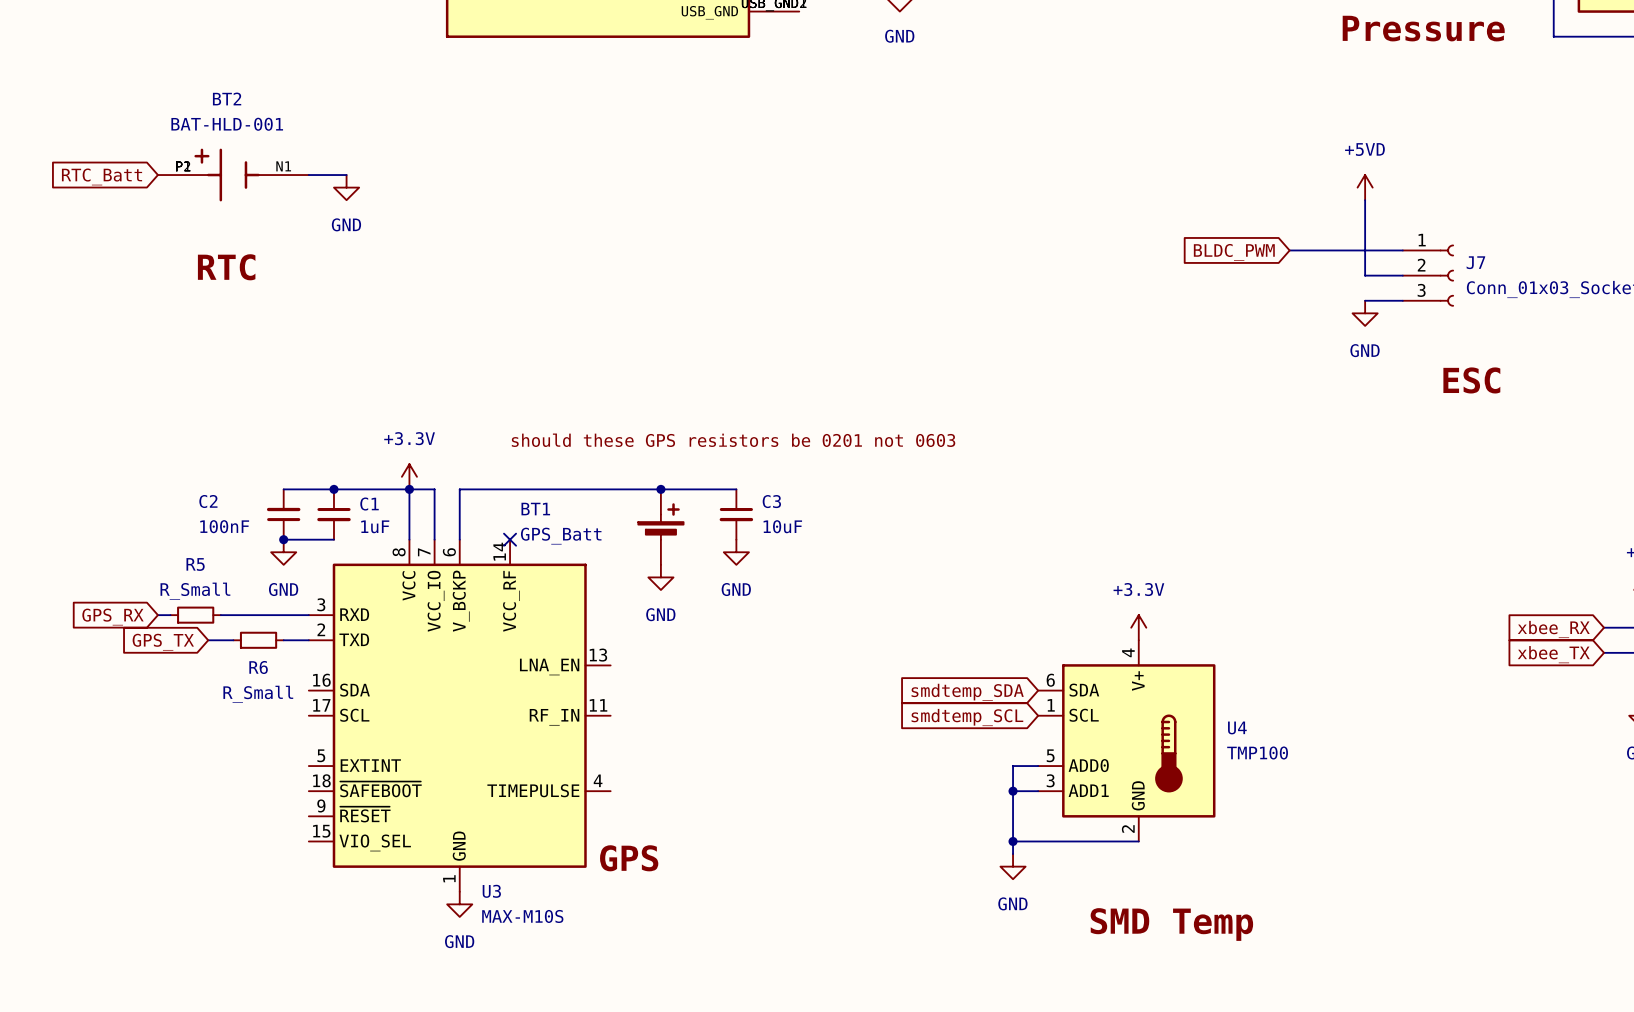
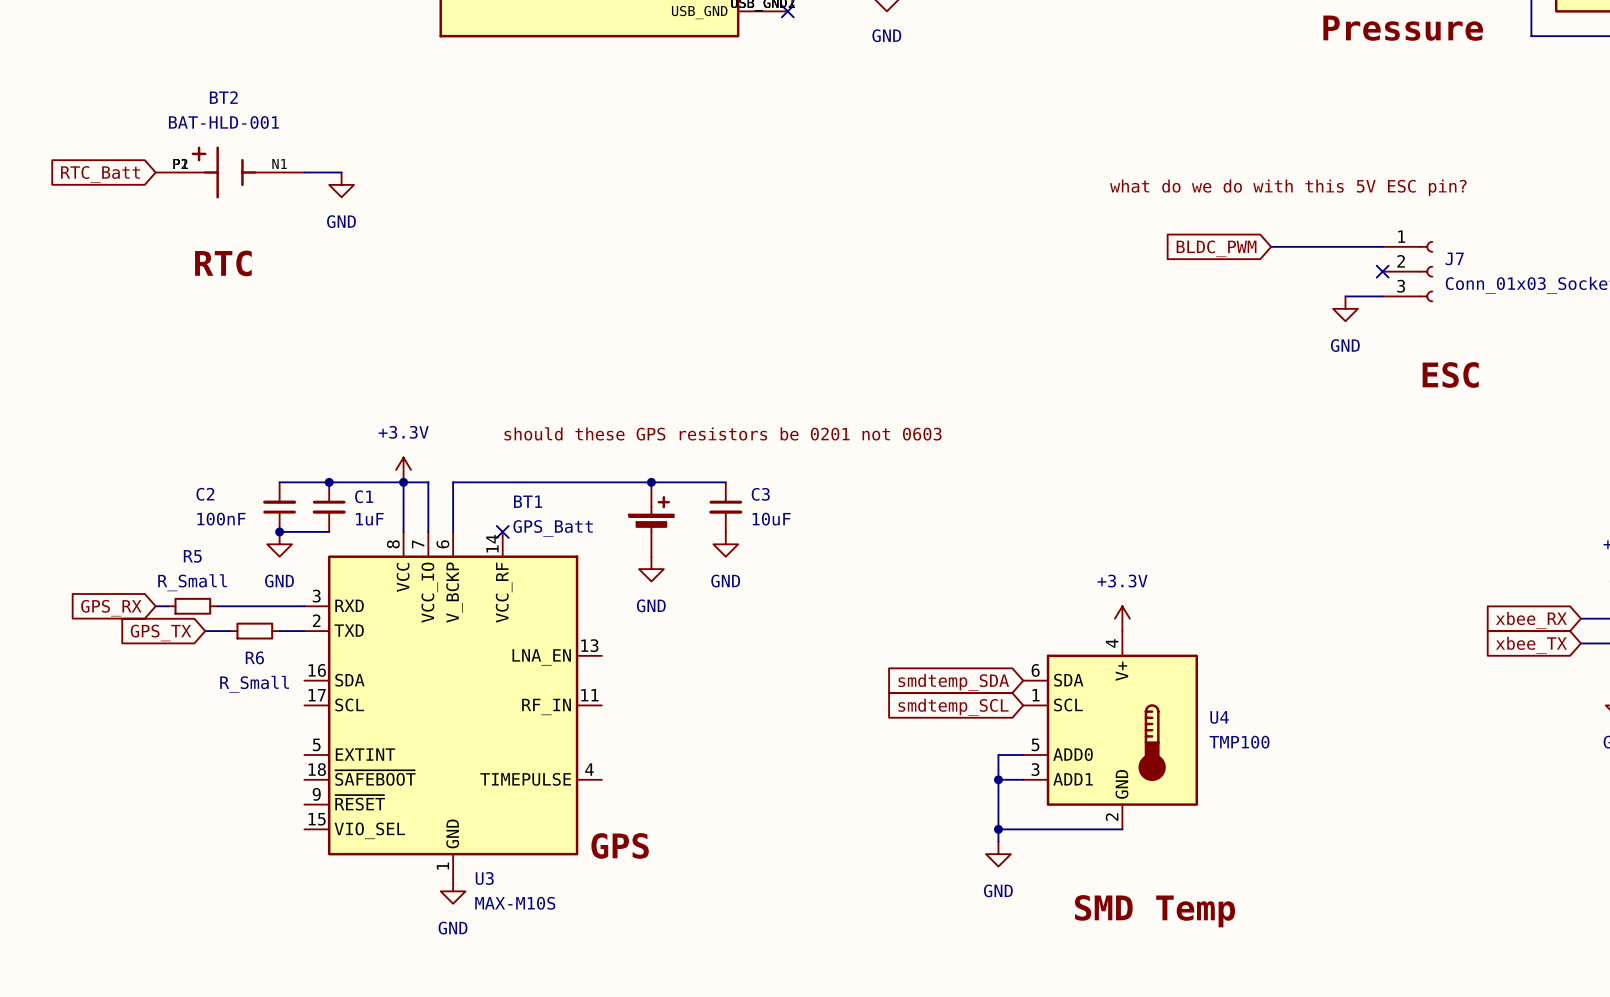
no-connect mark: none -> (787, 11)
power symbol: +5VD (1365, 187) -> none
label: none -> what do we do with this 5V ESC pin? (1288, 187)
wire: (1365, 200) (1365, 275) (1402, 275) -> none
no-connect mark: none -> (1382, 271)

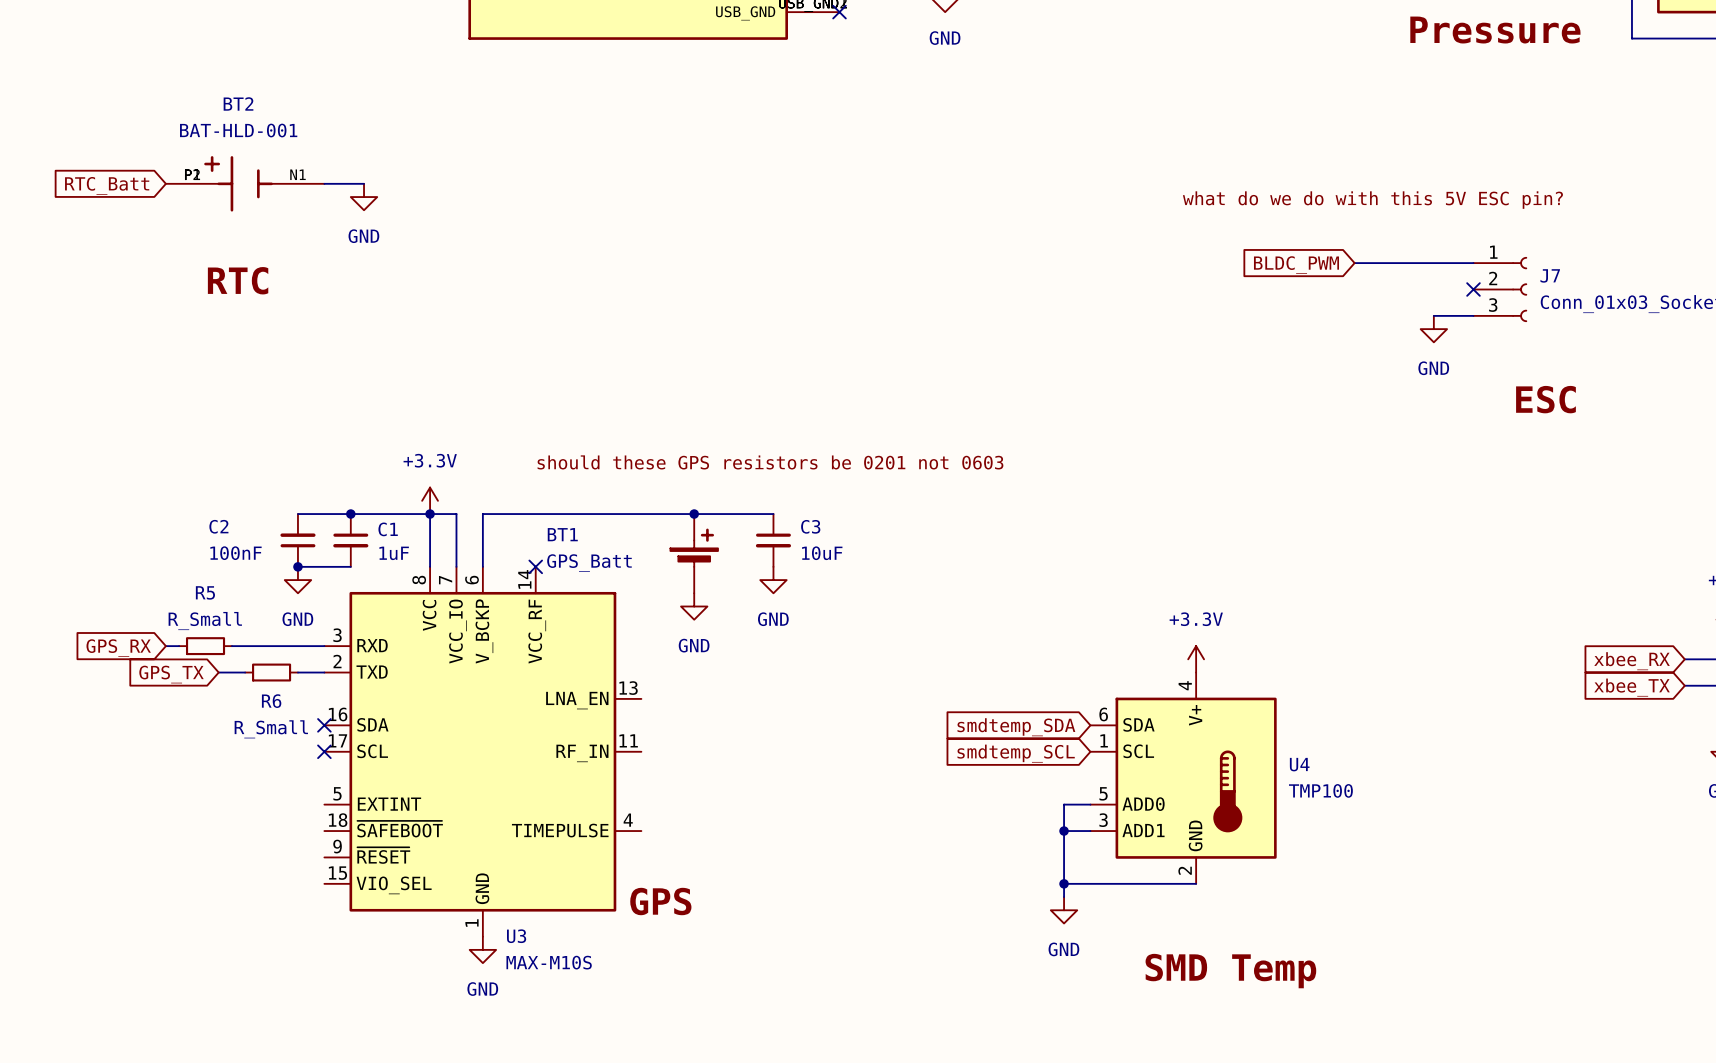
no-connect mark: none -> (324, 725)
no-connect mark: none -> (324, 751)

